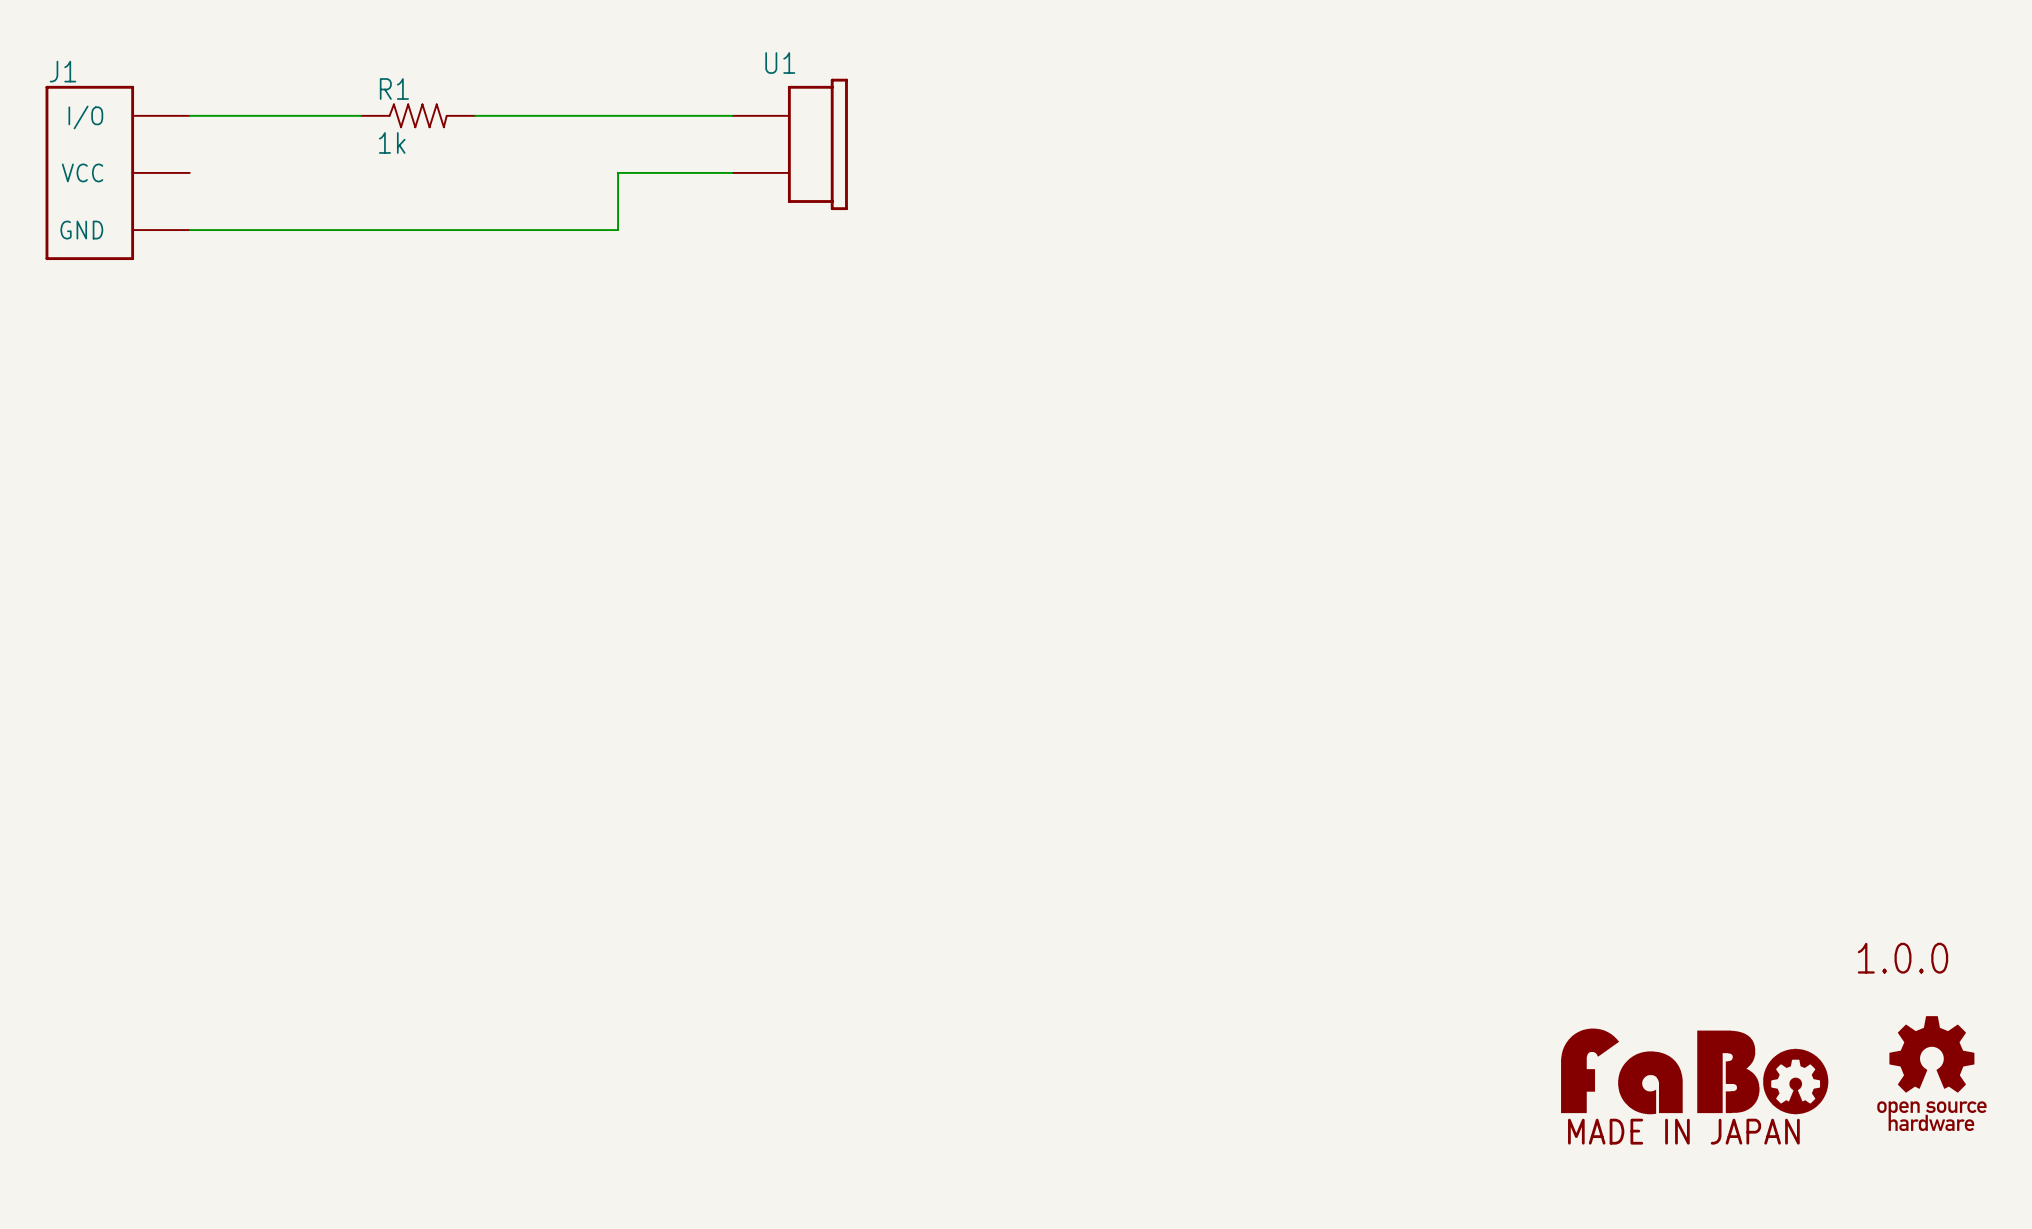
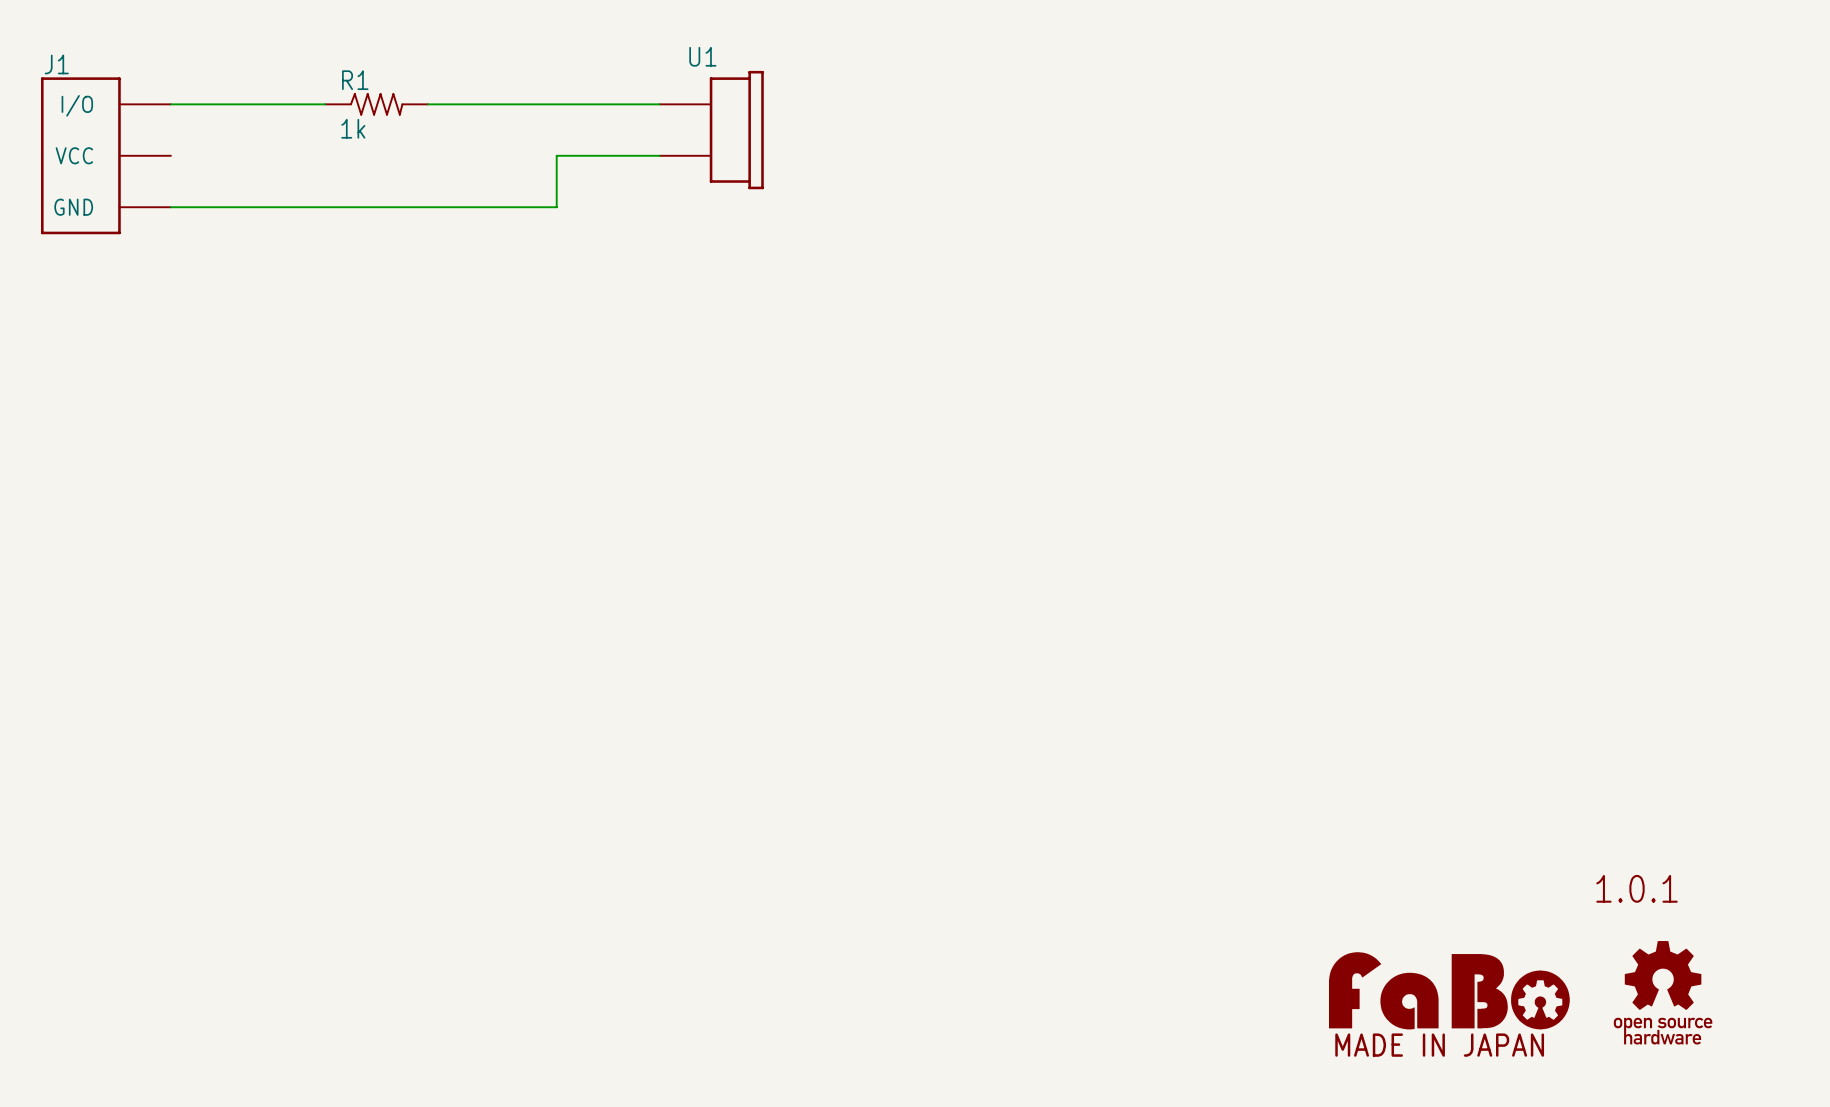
text: 1.0.0 (1902, 958) -> 1.0.1 (1637, 888)
part position: (1694, 1071) -> (1449, 990)
part position: (1931, 1073) -> (1663, 992)

